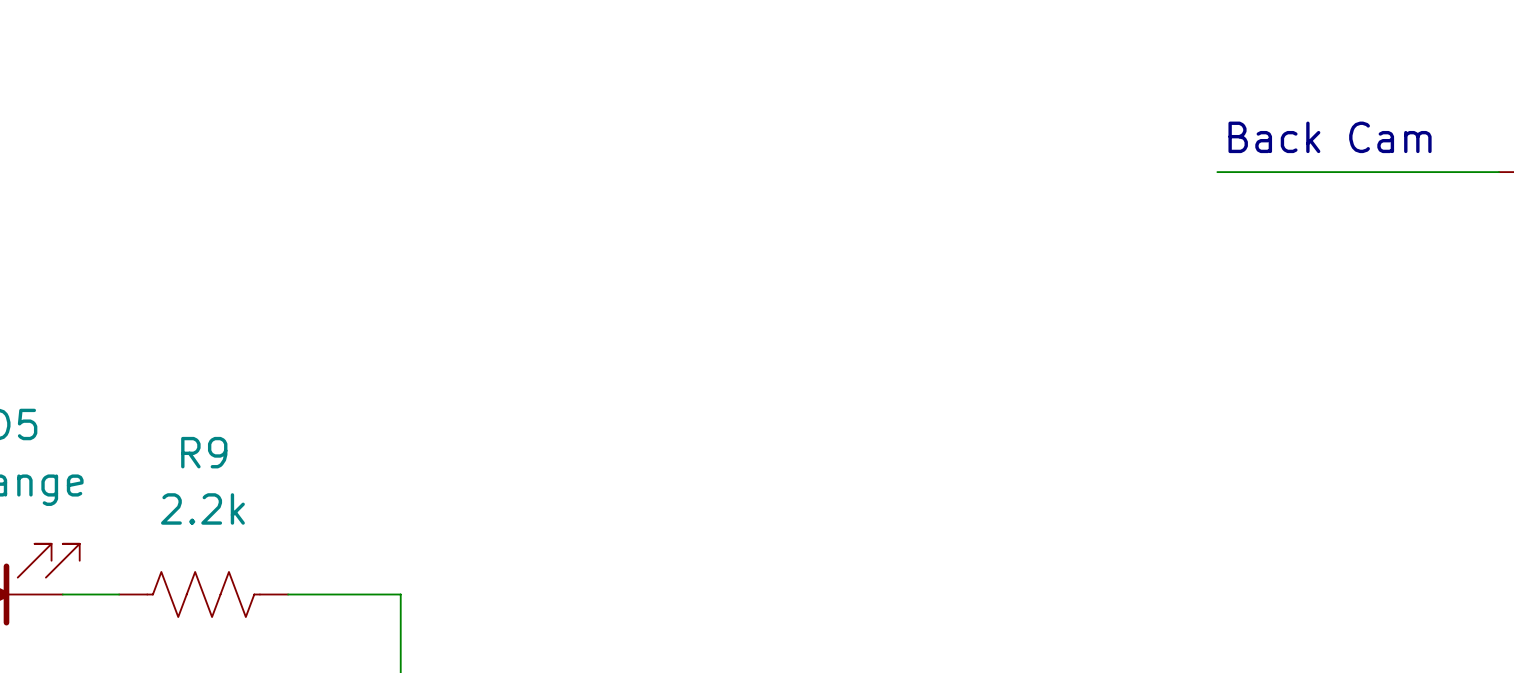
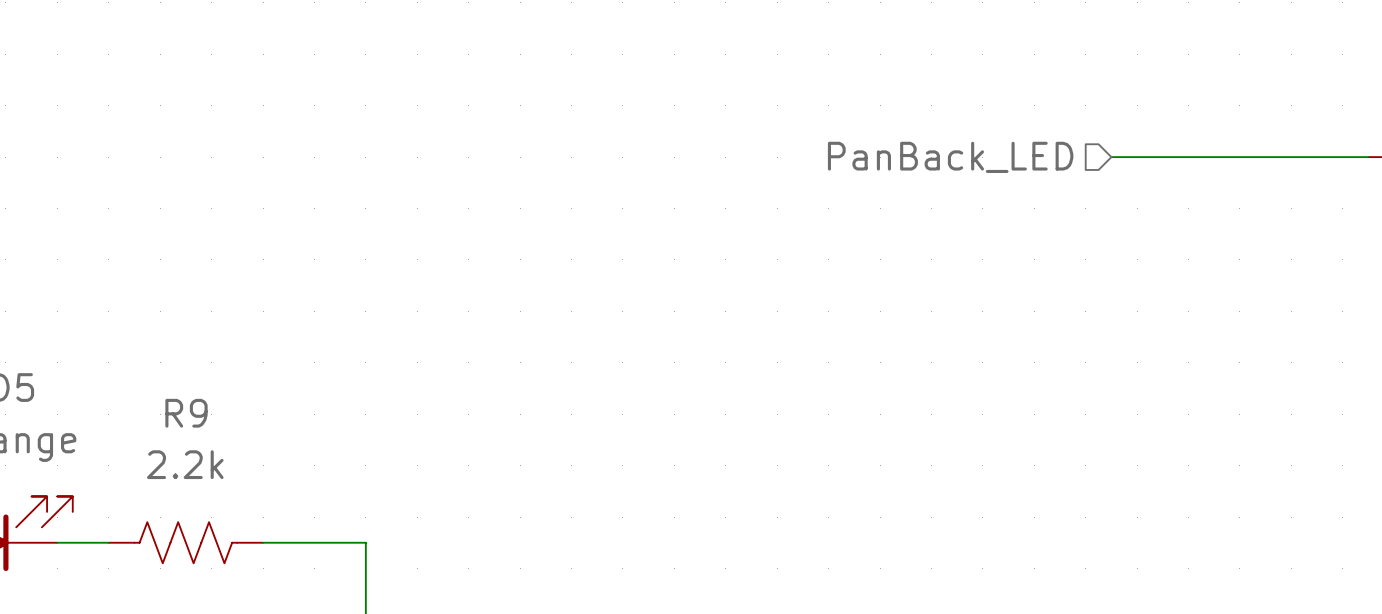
text: Back Cam (1330, 137) -> none
hierarchical label: none -> PanBack_LED (950, 157)

